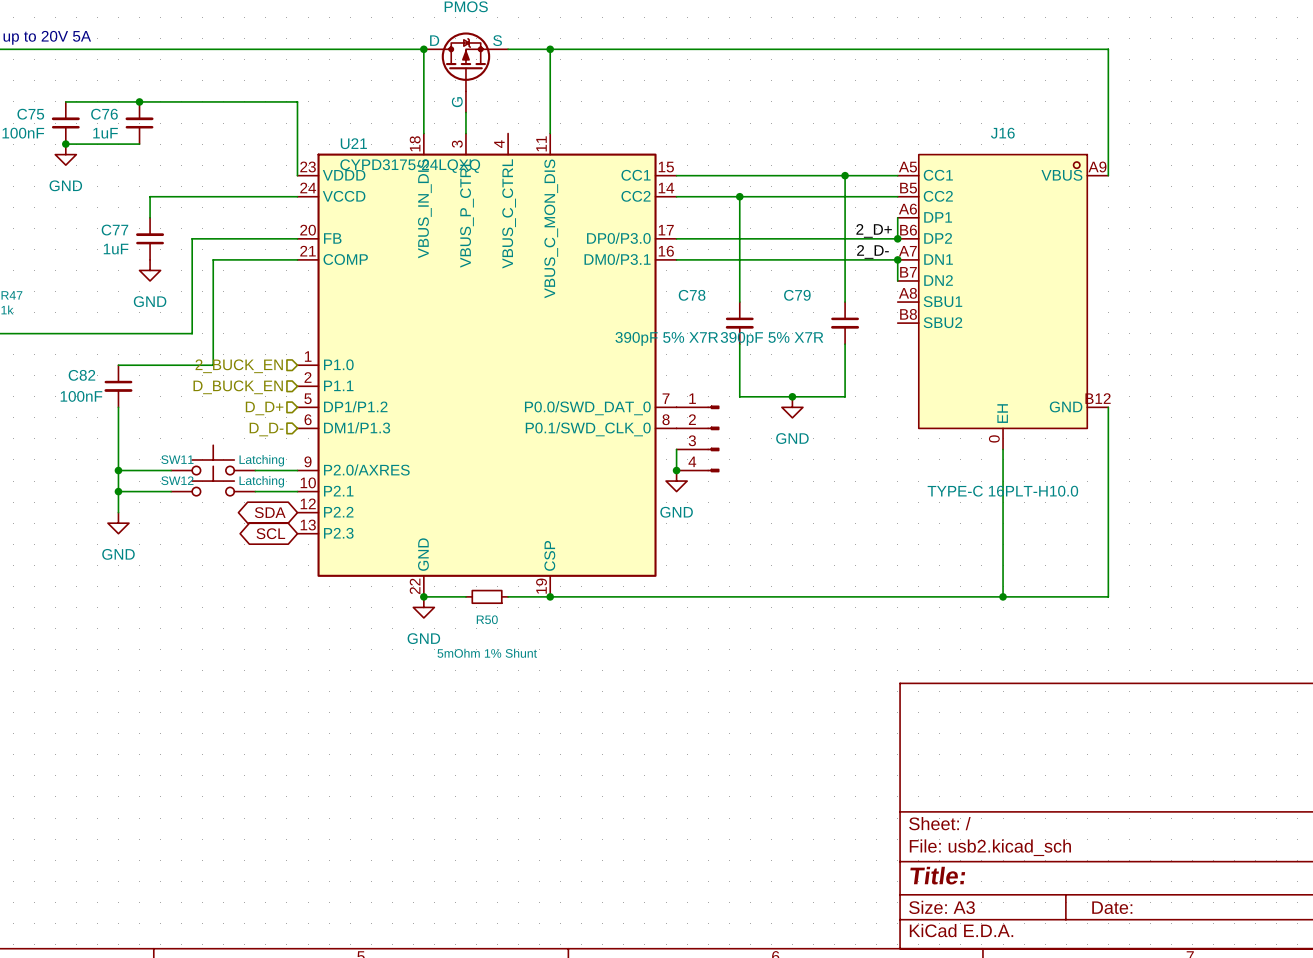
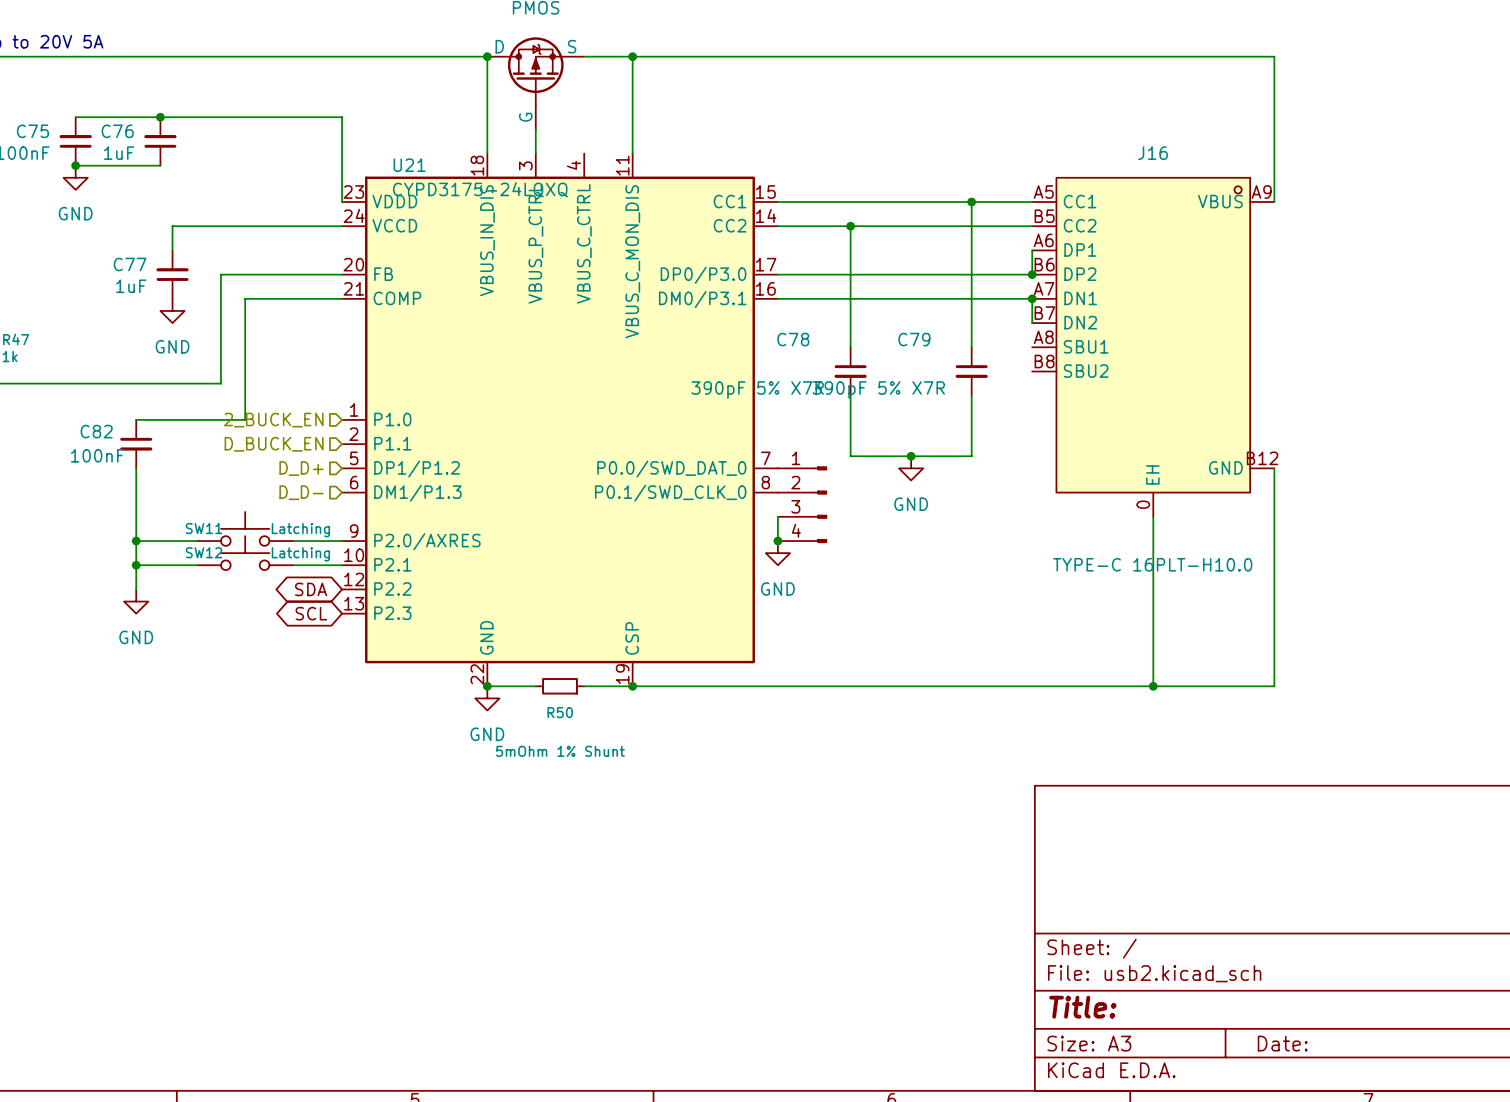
label: 2_D+ (874, 230) -> none
label: 2_D- (872, 251) -> none

